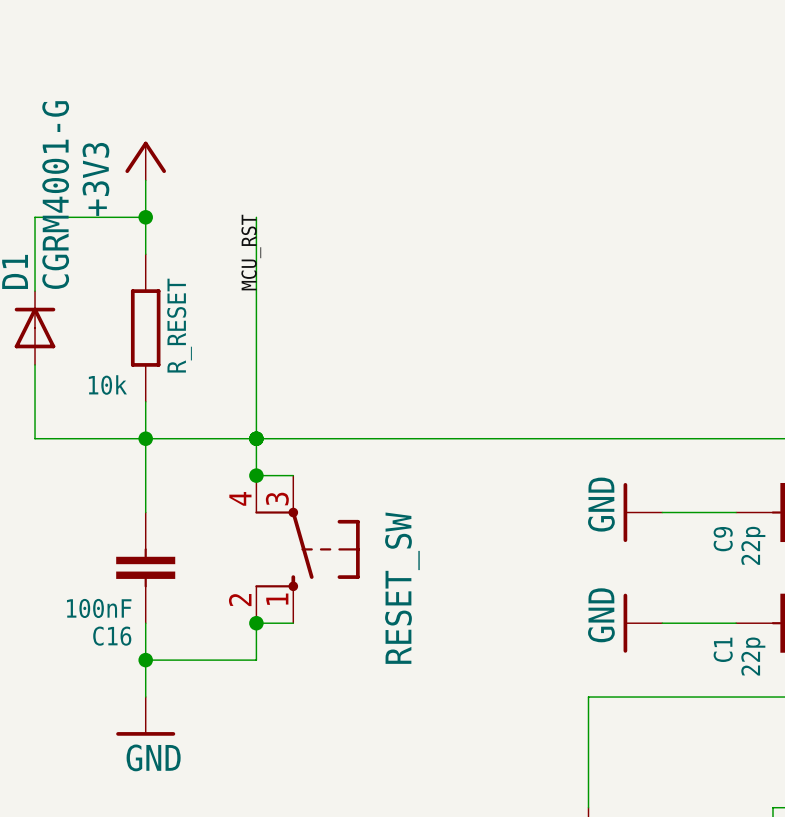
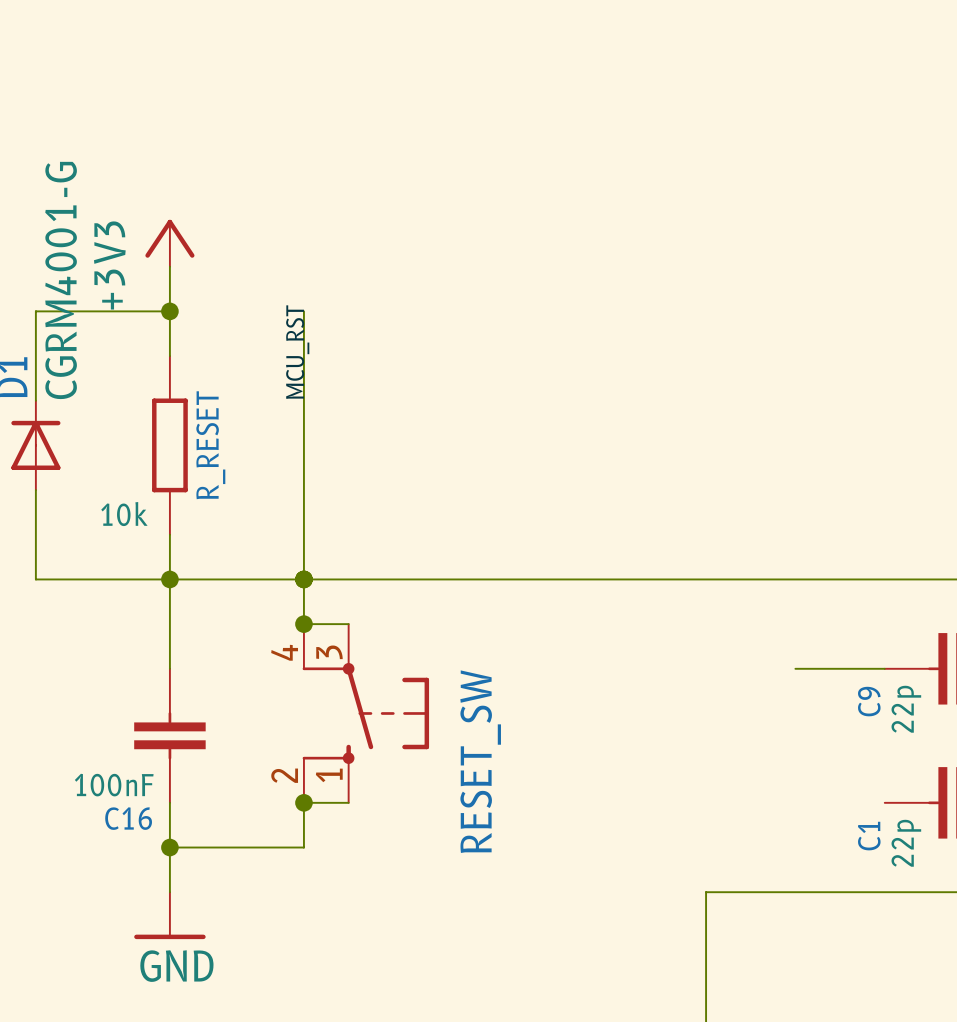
power symbol: GND (642, 512) -> none
power symbol: GND (642, 623) -> none
wire: (662, 623) (736, 623) -> none

